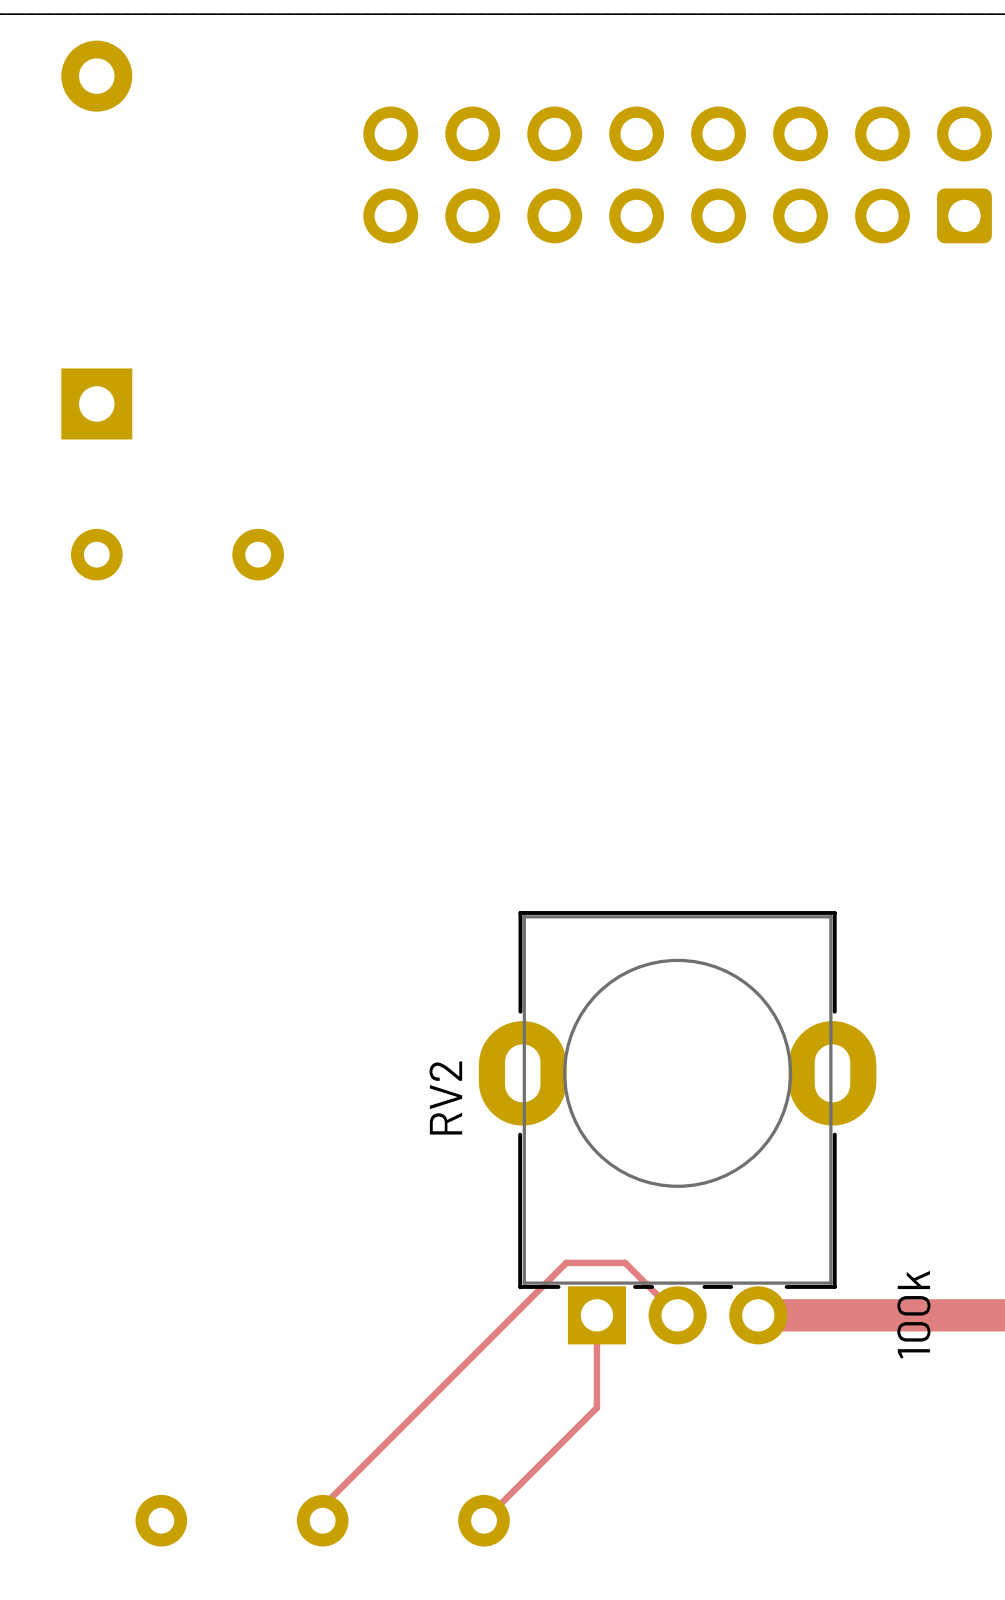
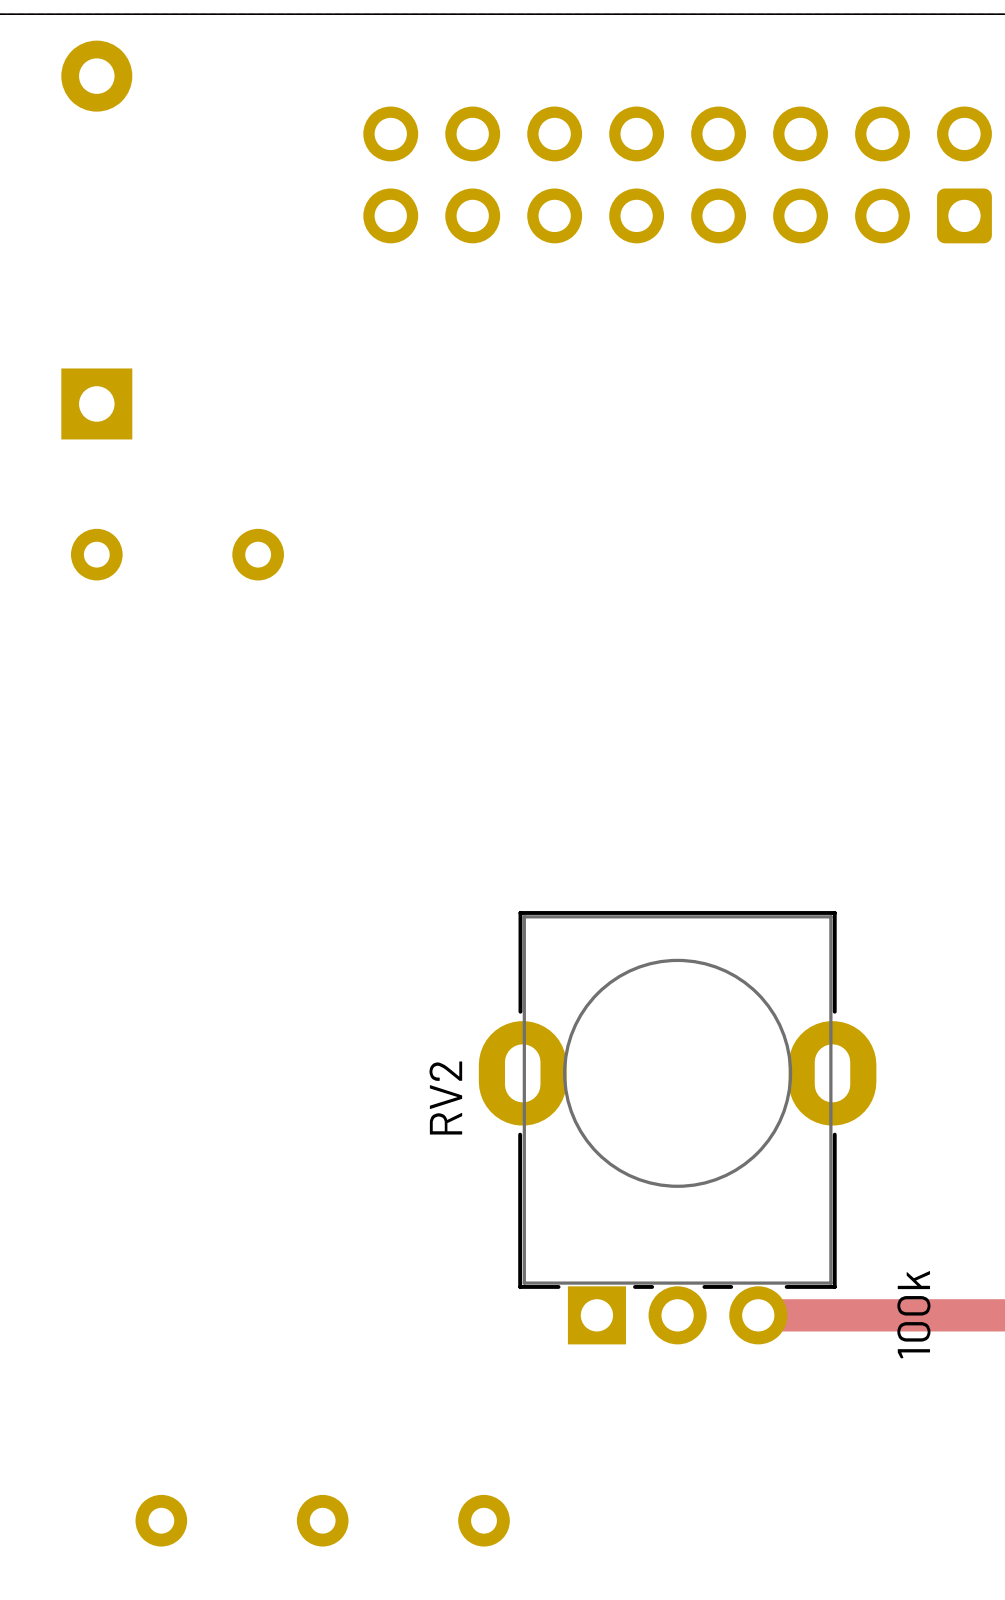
track: (596, 1315) (596, 1407) (484, 1520) -> none
track: (677, 1315) (625, 1262) (566, 1262) (322, 1506) (322, 1520) -> none

